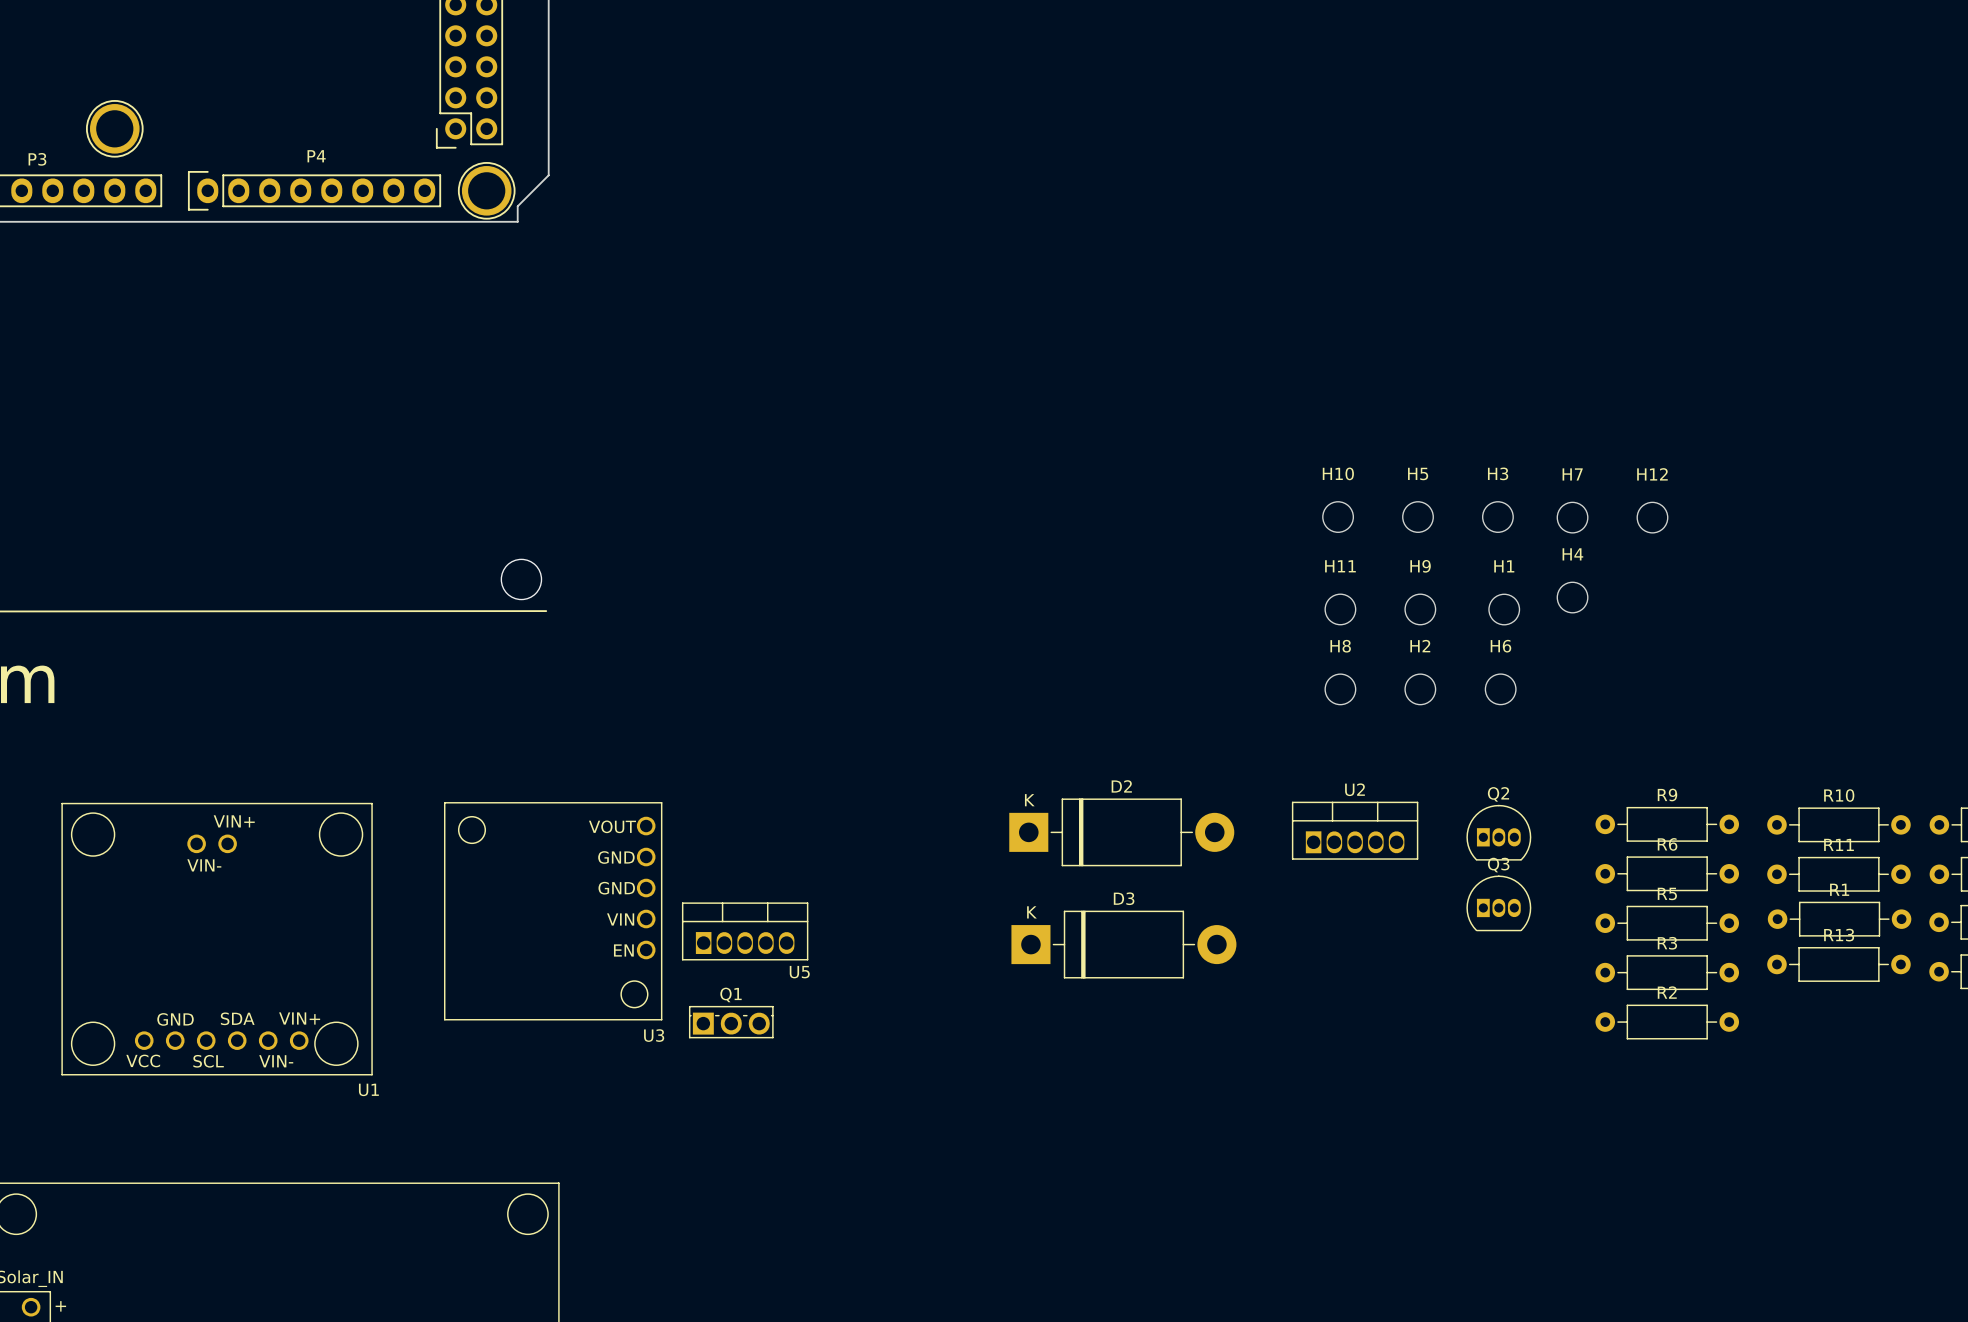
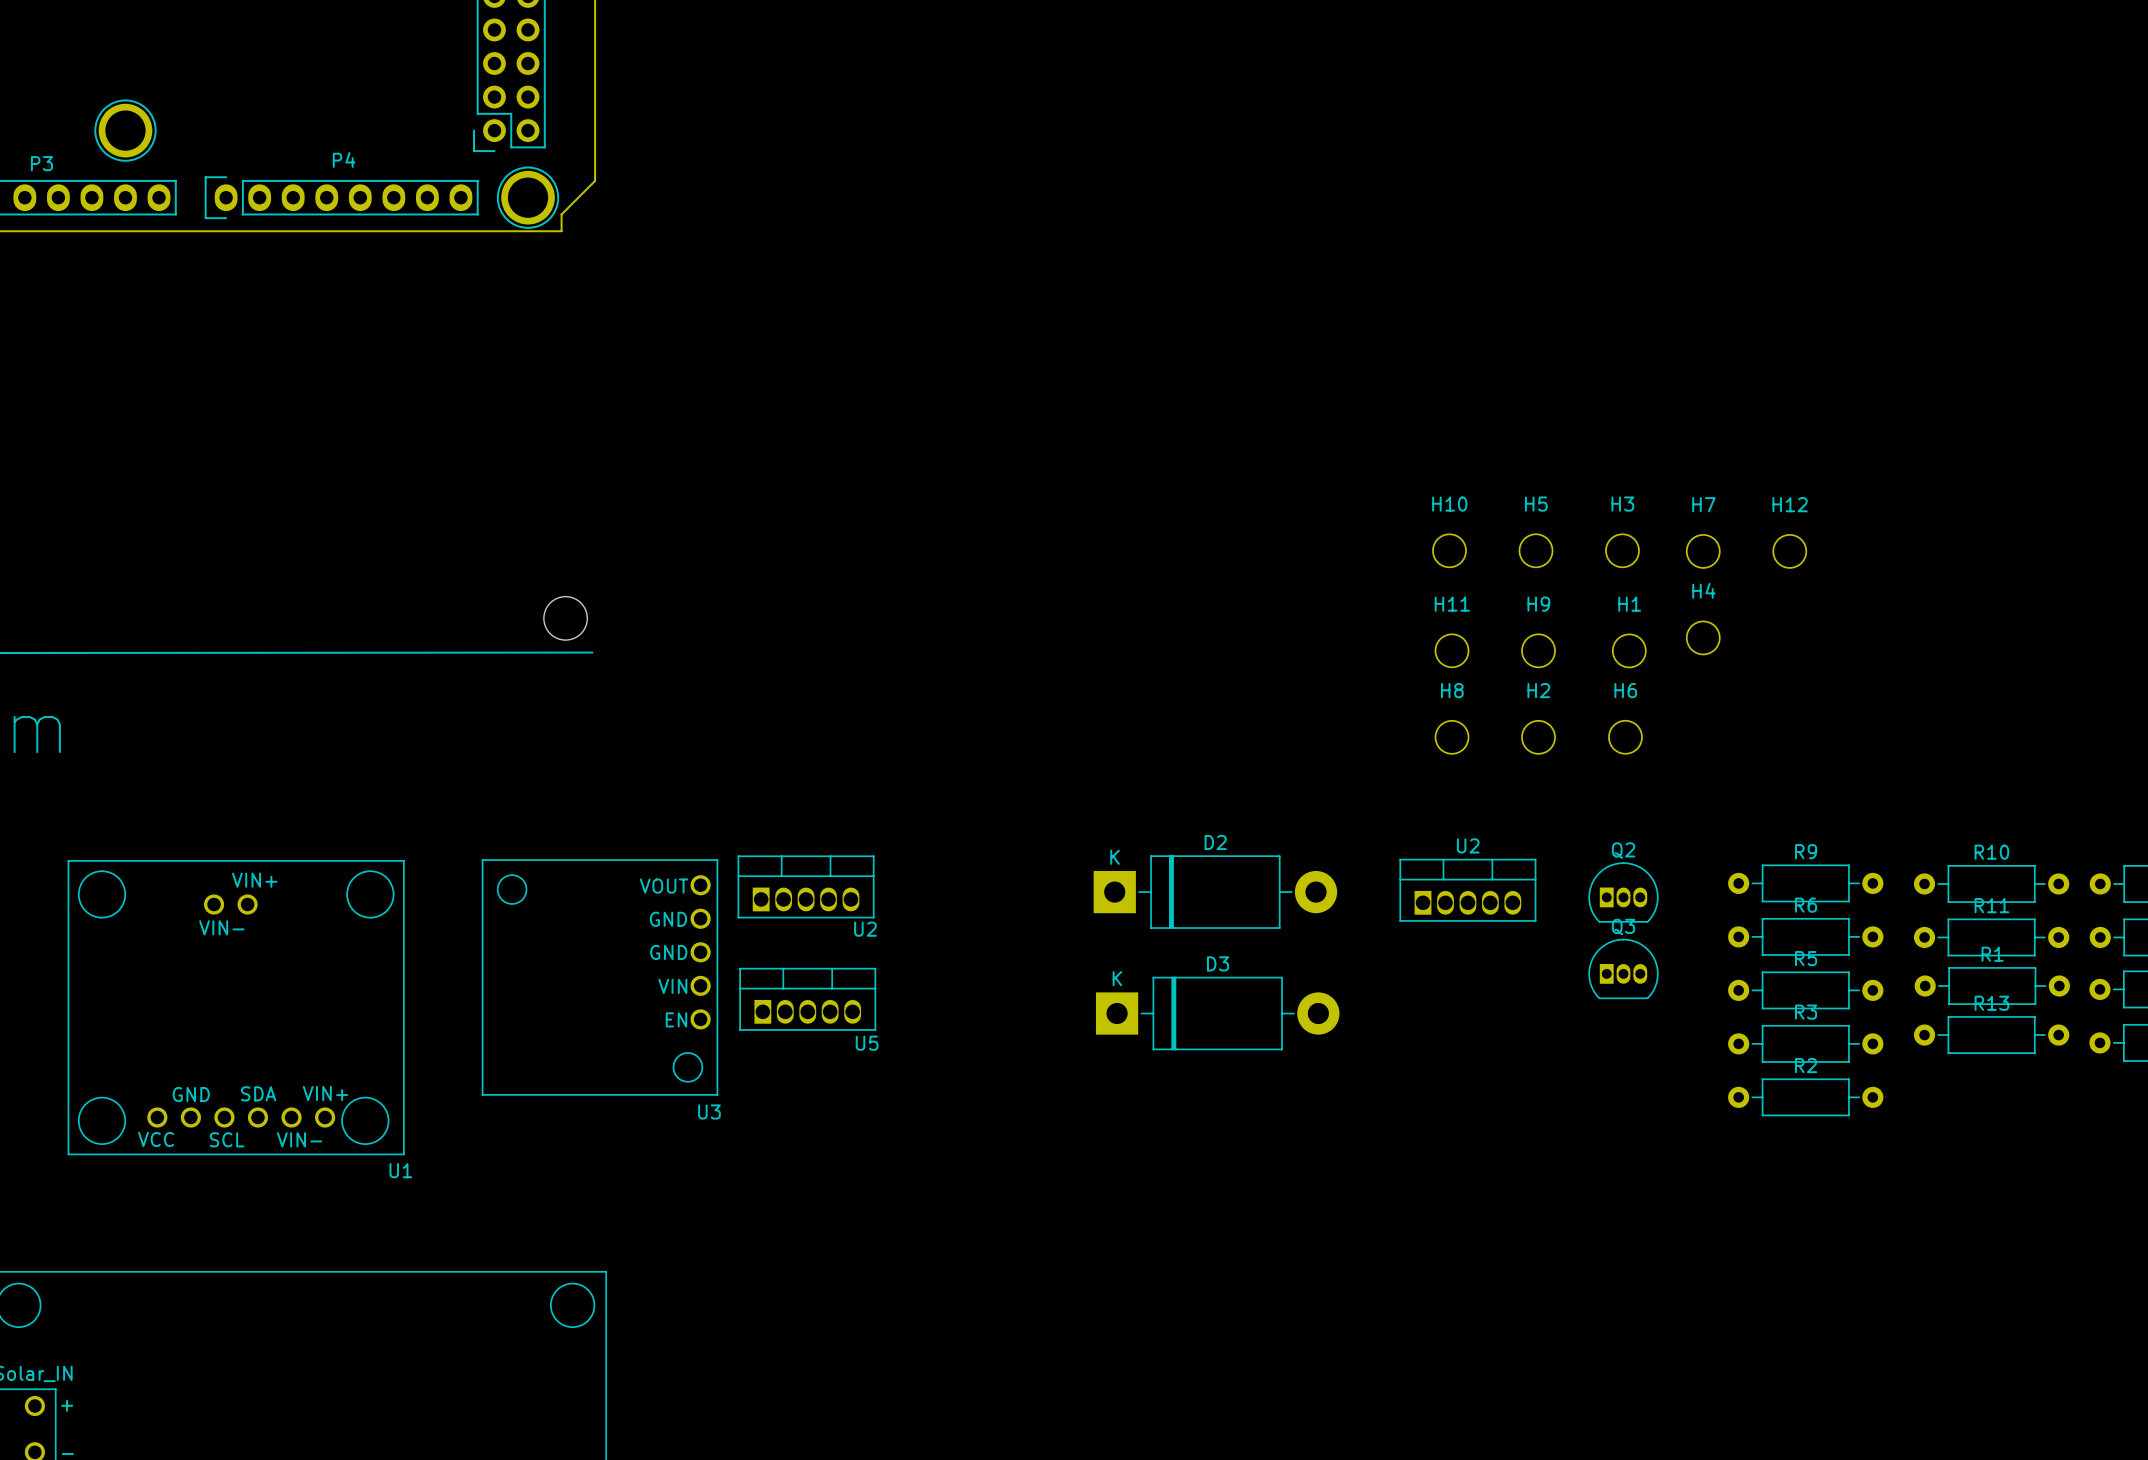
U2: none -> (806, 886)
Q1: (731, 1022) -> none

